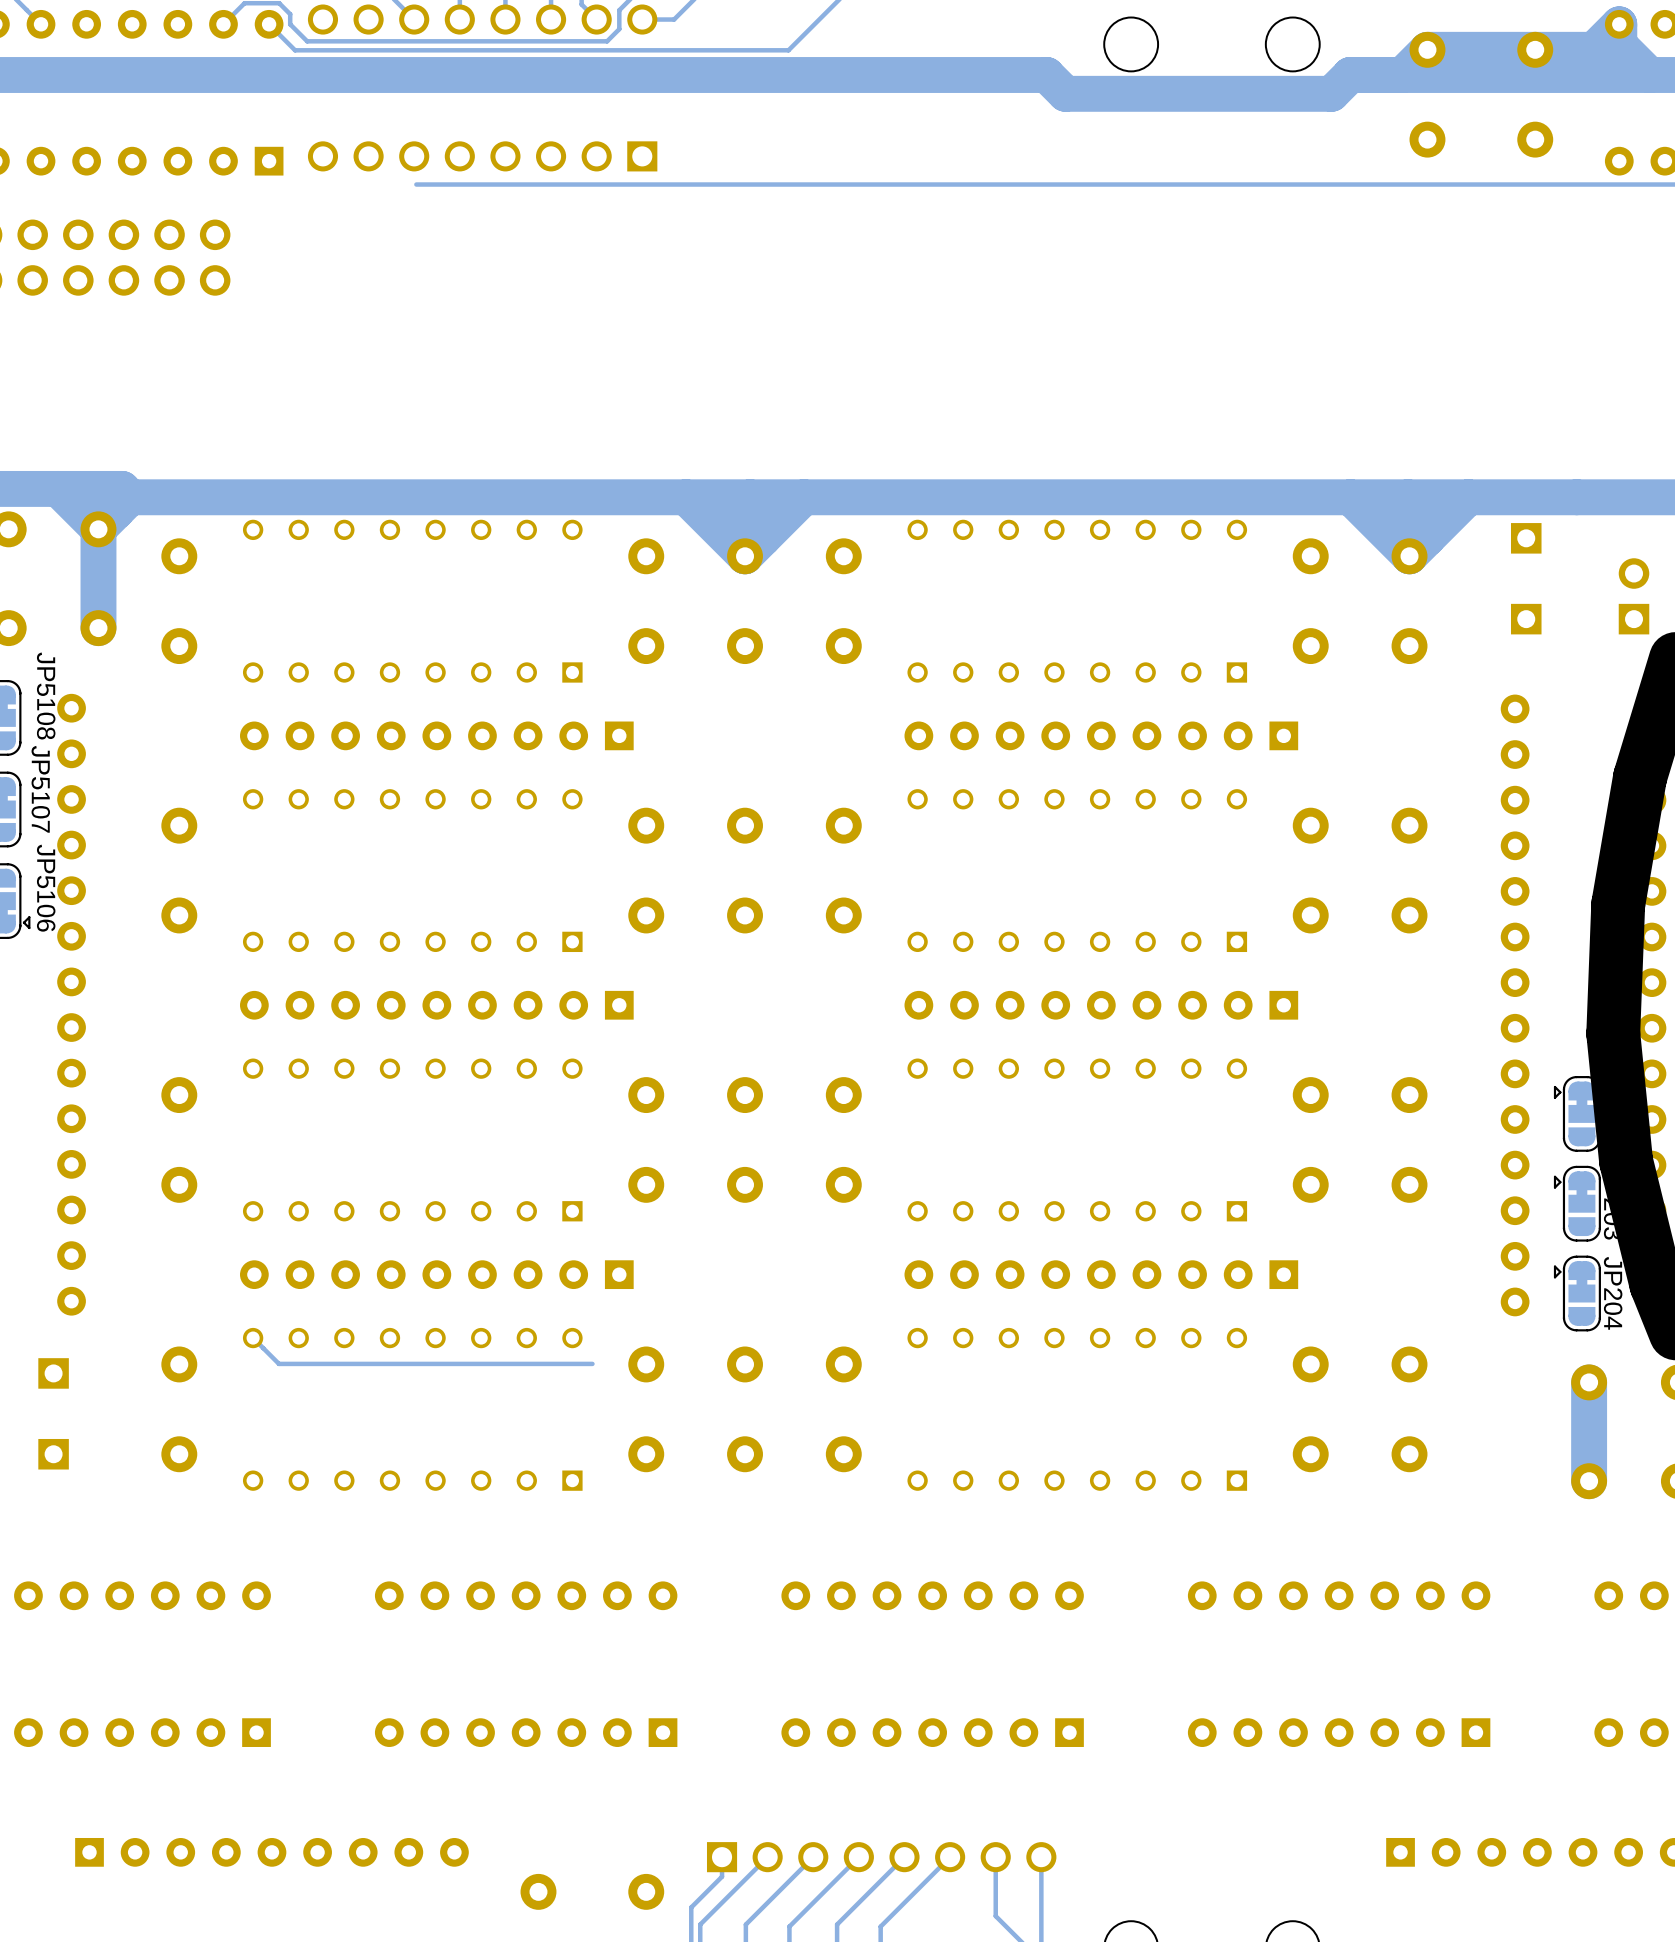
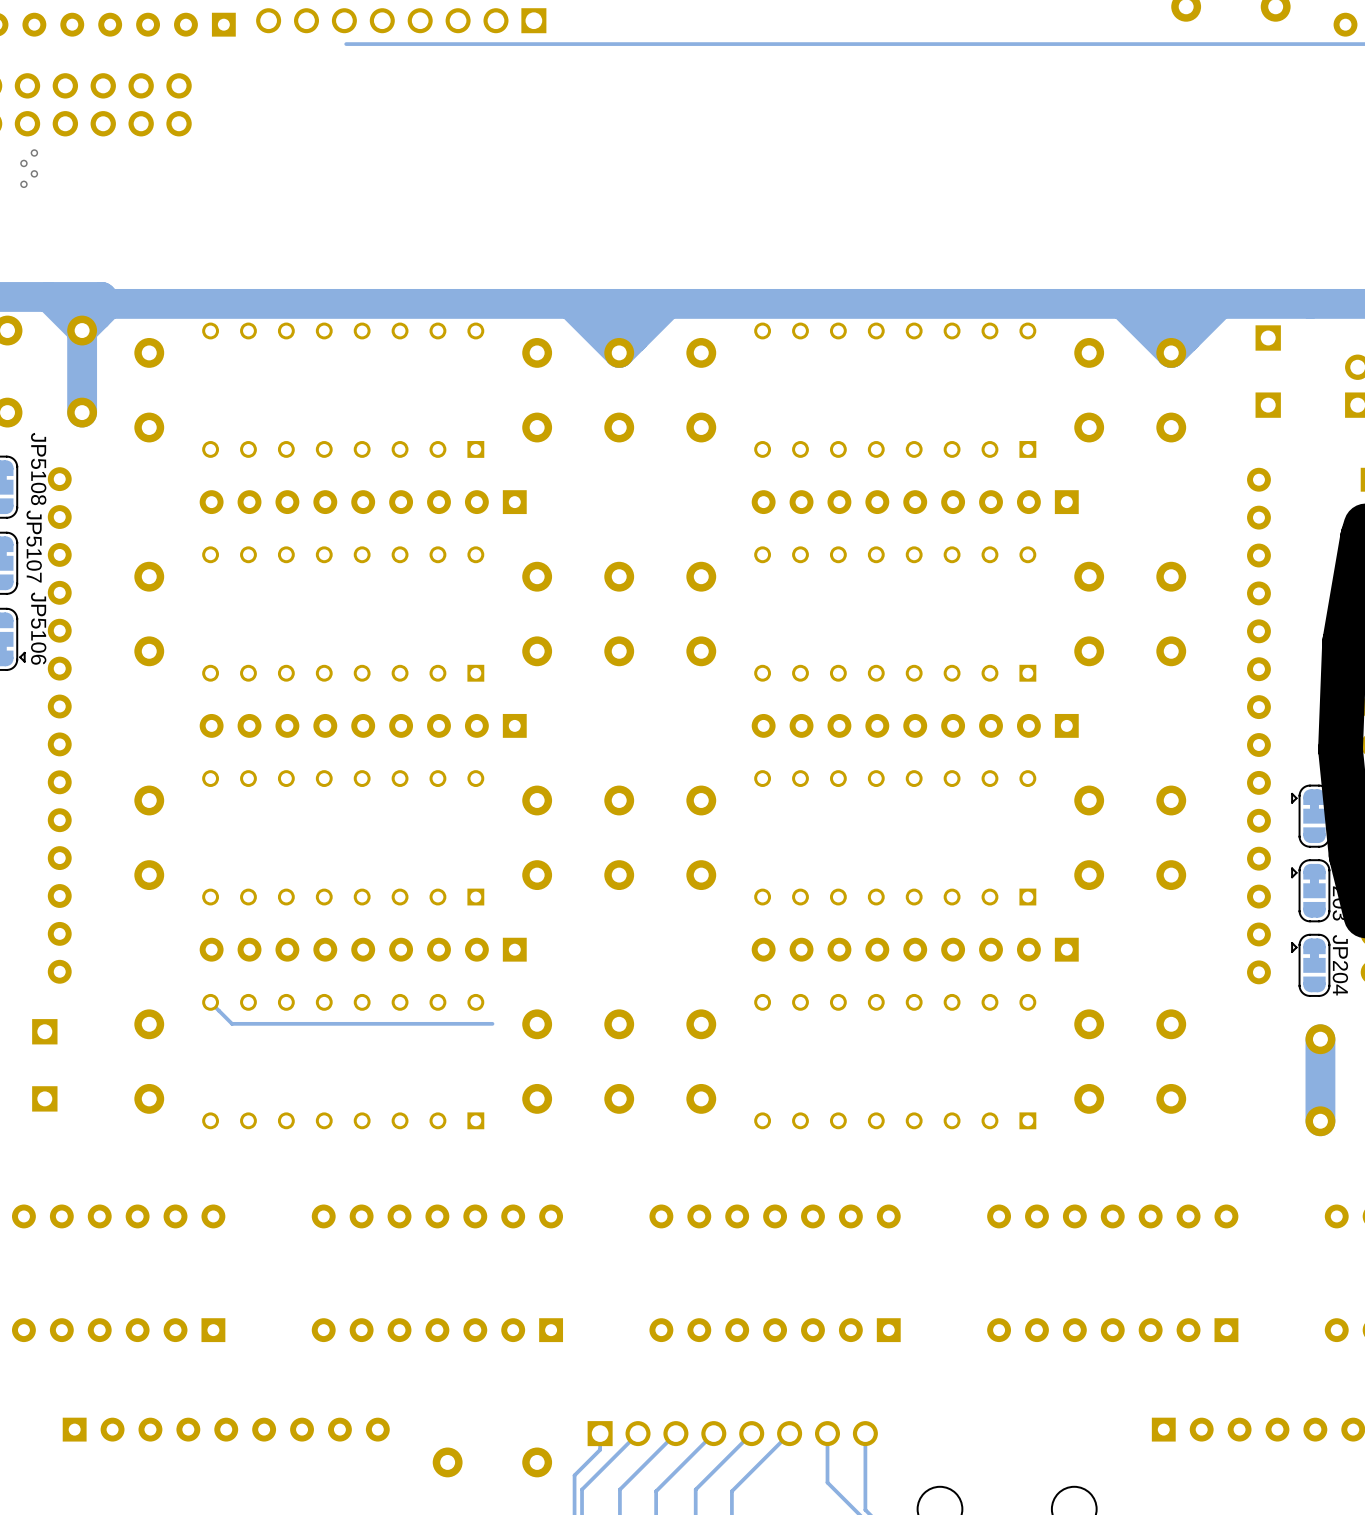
via: none -> (34, 152)
via: none -> (23, 163)
via: none -> (34, 173)
via: none -> (23, 184)

